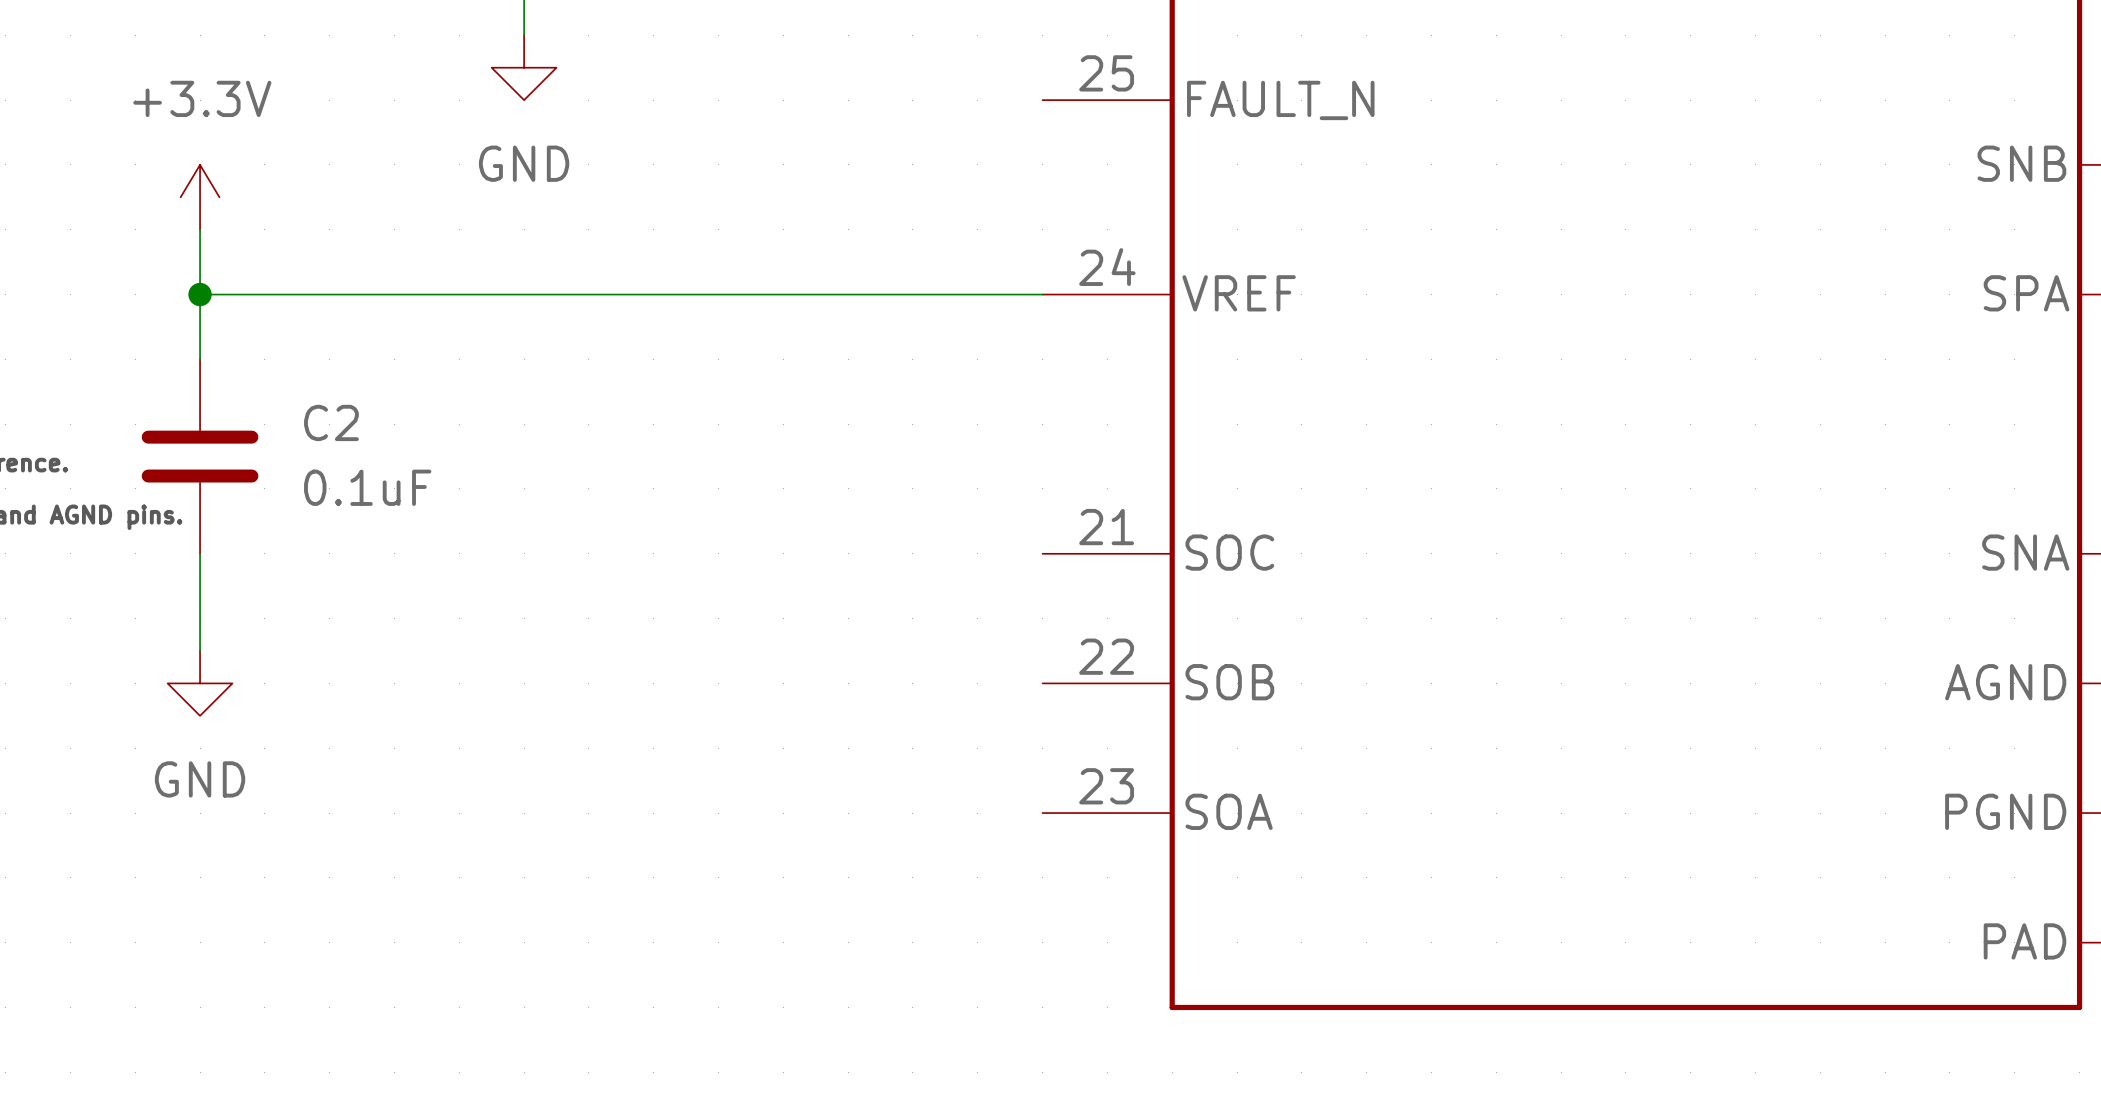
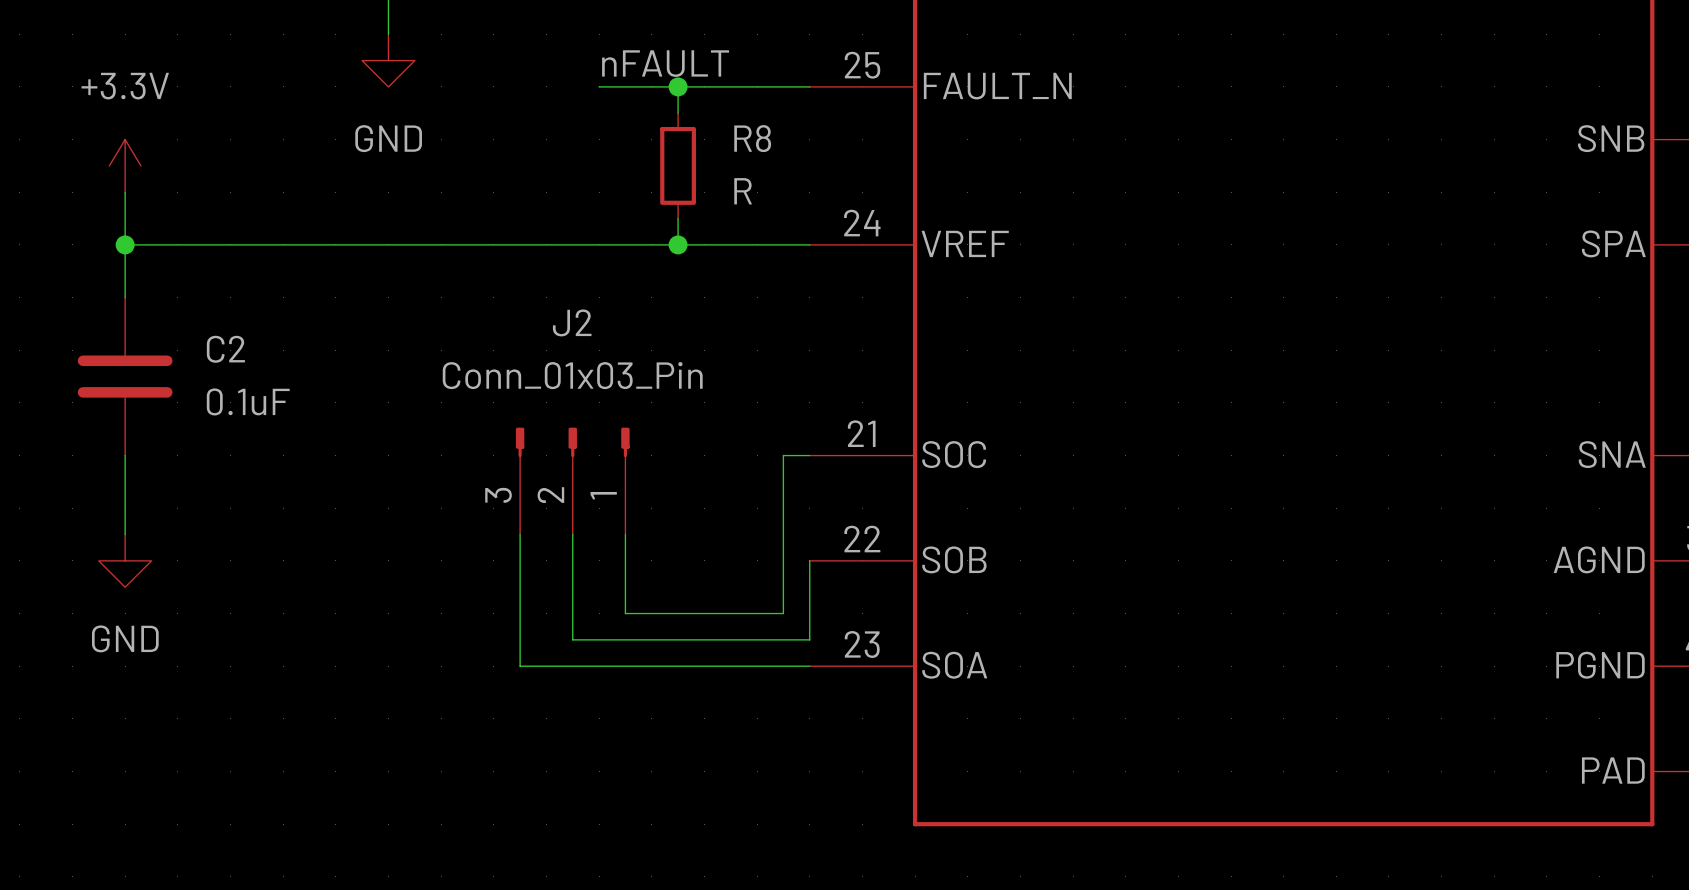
label: none -> nFAULT (665, 63)
wire: none -> (599, 86) (809, 86)
wire: none -> (678, 86) (678, 113)
junction: none -> (678, 86)
R8: none -> R (678, 165)
wire: none -> (678, 218) (678, 244)
junction: none -> (678, 244)
wire: none -> (809, 455) (783, 455) (783, 613) (625, 613) (625, 534)
J2: none -> Conn_01x03_Pin (572, 481)
wire: none -> (520, 534) (520, 666) (809, 666)
wire: none -> (572, 534) (572, 639) (809, 639) (809, 560)

